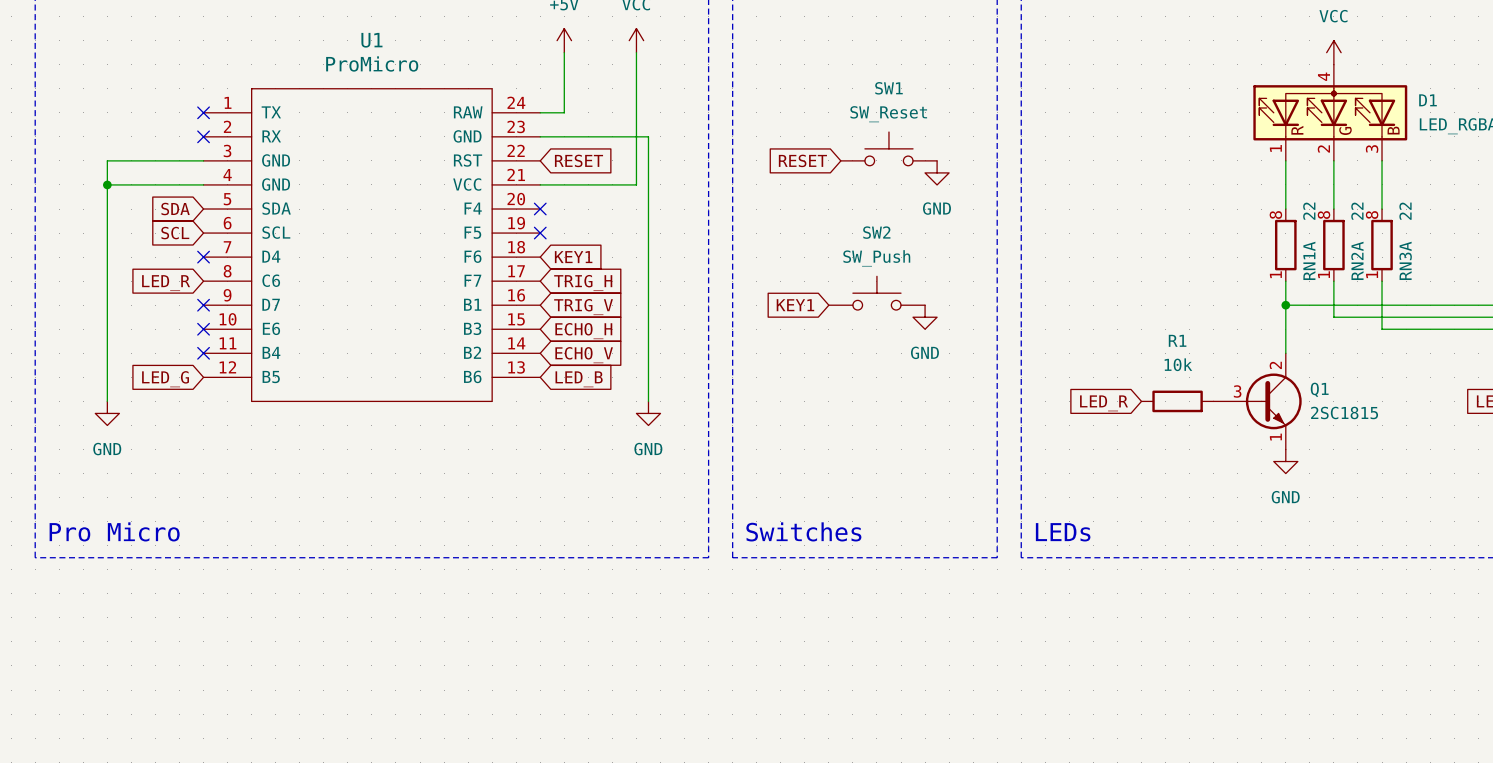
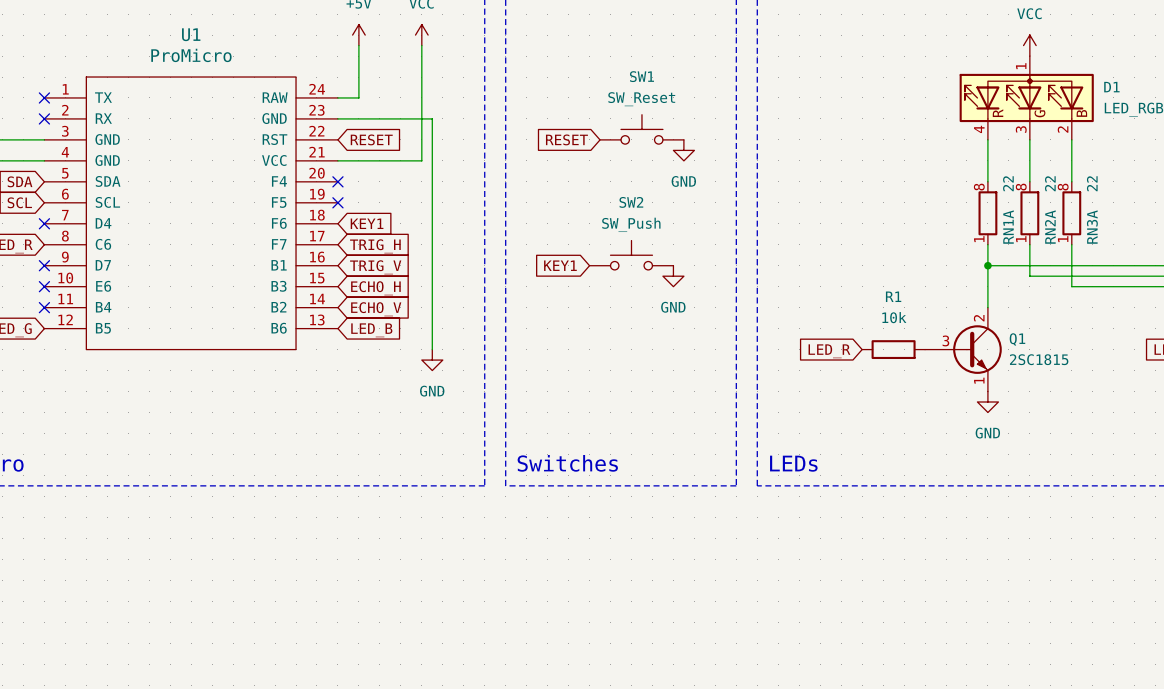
D1 pin number: 4 (1323, 76) -> 1 (1021, 66)
D1 pin number: 1 (1275, 148) -> 4 (979, 129)
D1 pin number: 2 (1323, 148) -> 3 (1021, 129)
D1 pin number: 3 (1372, 148) -> 2 (1063, 129)

